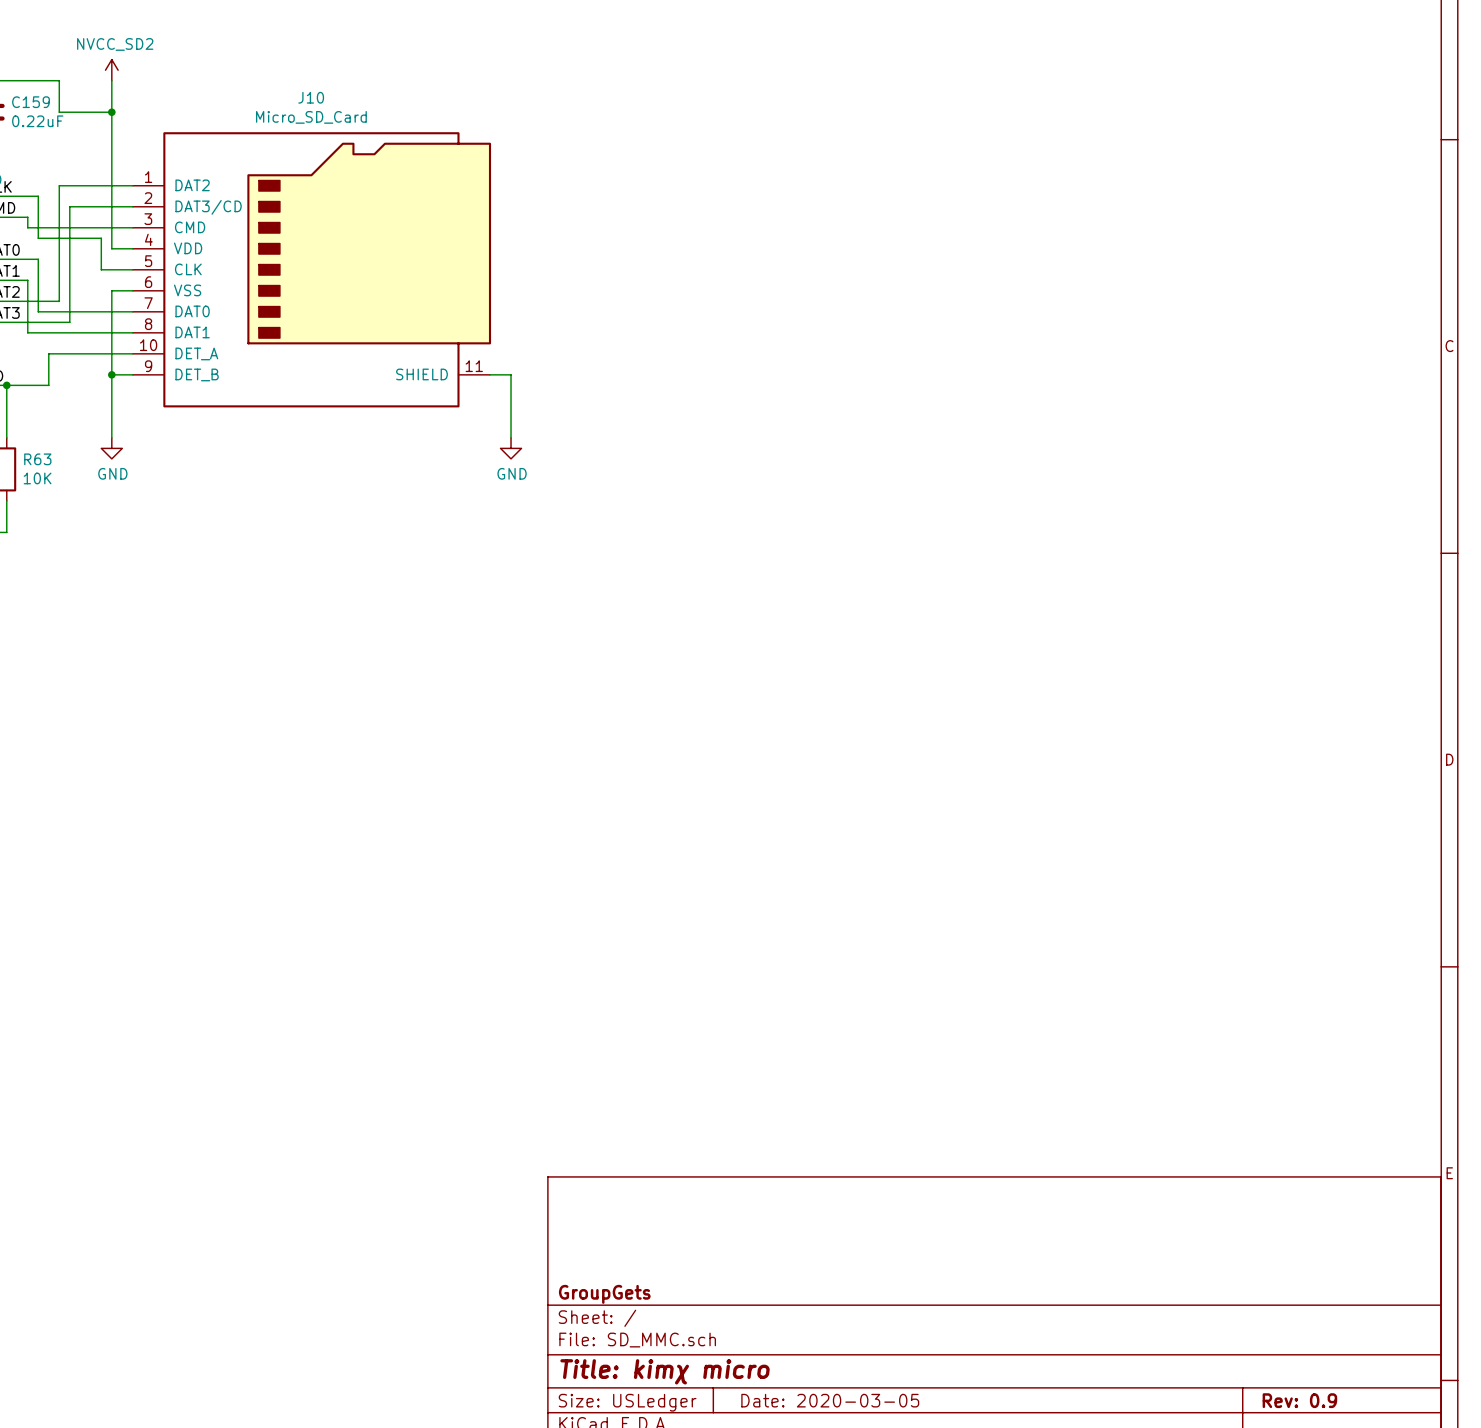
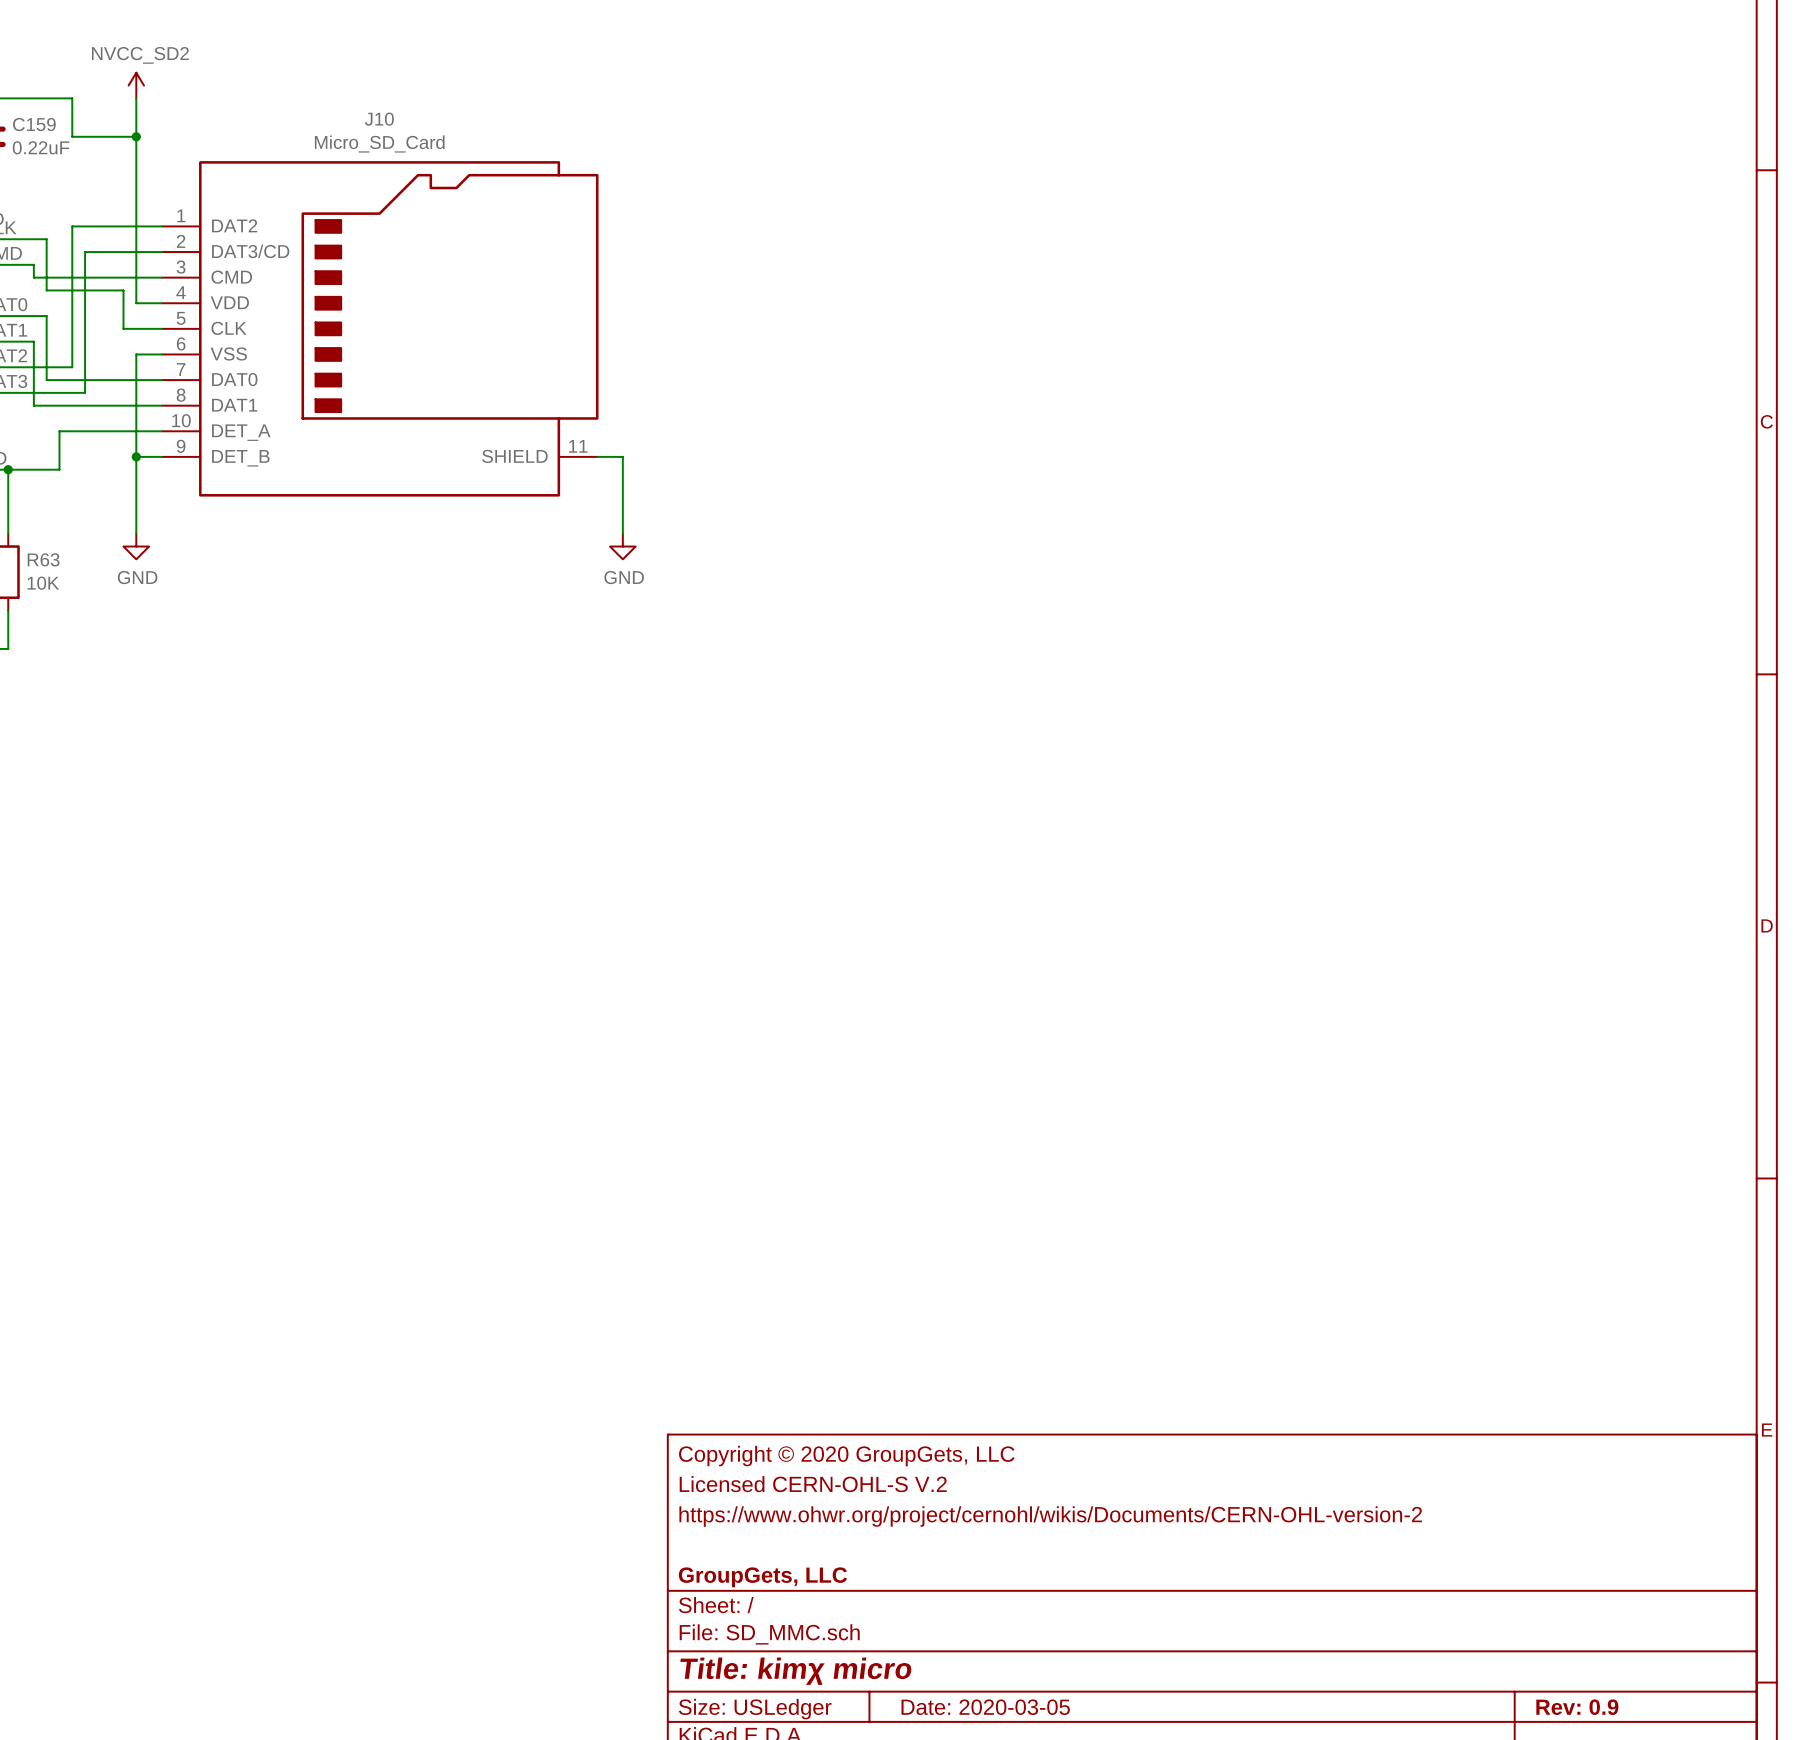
title block: none -> Copyright © 2020 GroupGets, LLC (846, 1456)
title block: none -> Licensed CERN-OHL-S V.2 (813, 1484)
title block: none -> https://www.ohwr.org/project/cernohl/wikis/Documents/CERN-OHL-version-2 (1050, 1516)
title block: GroupGets (604, 1294) -> GroupGets, LLC (762, 1577)

